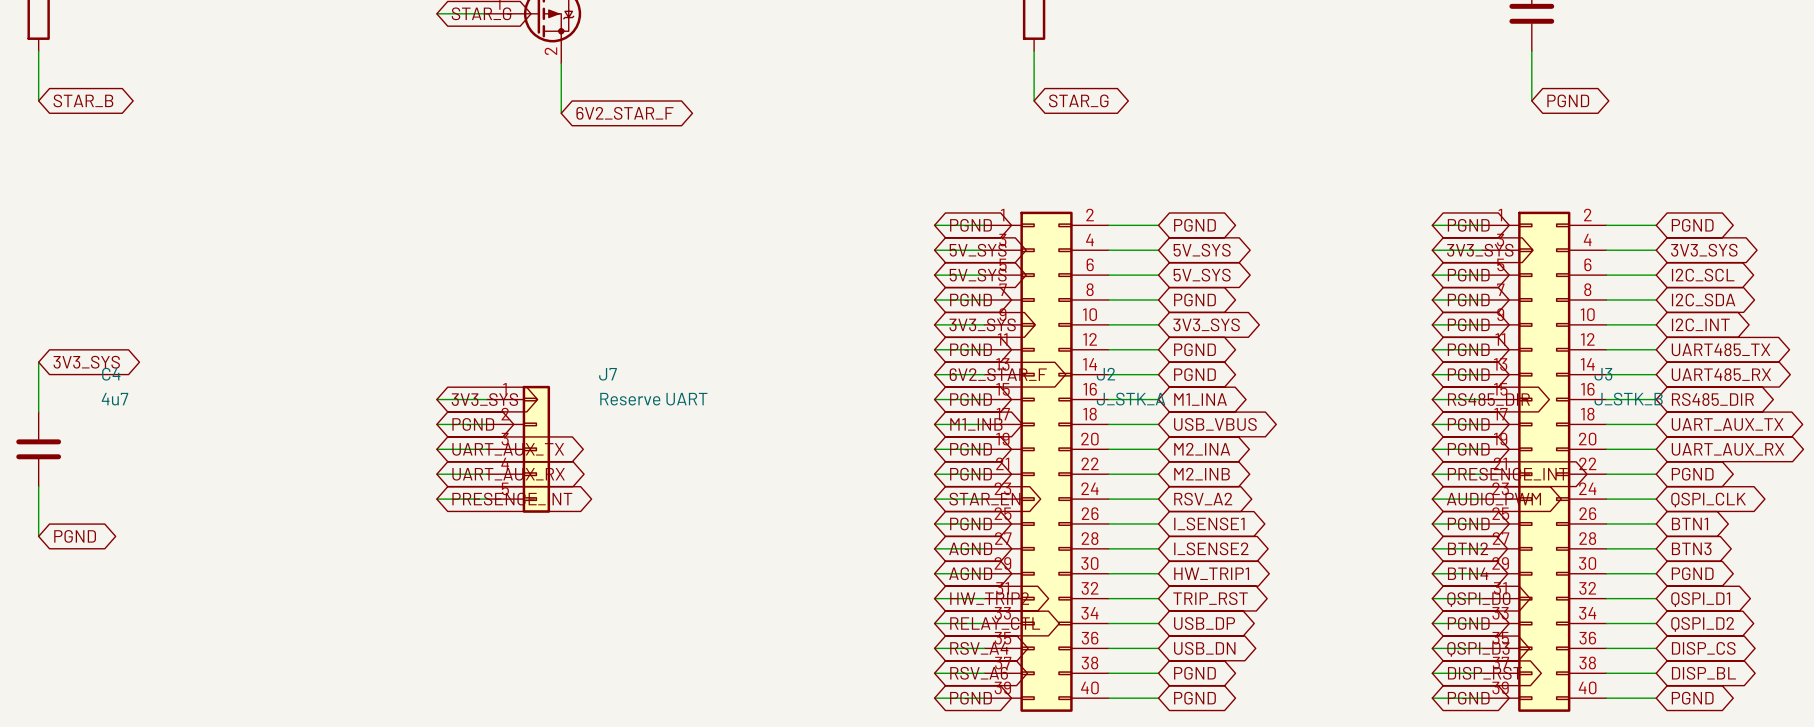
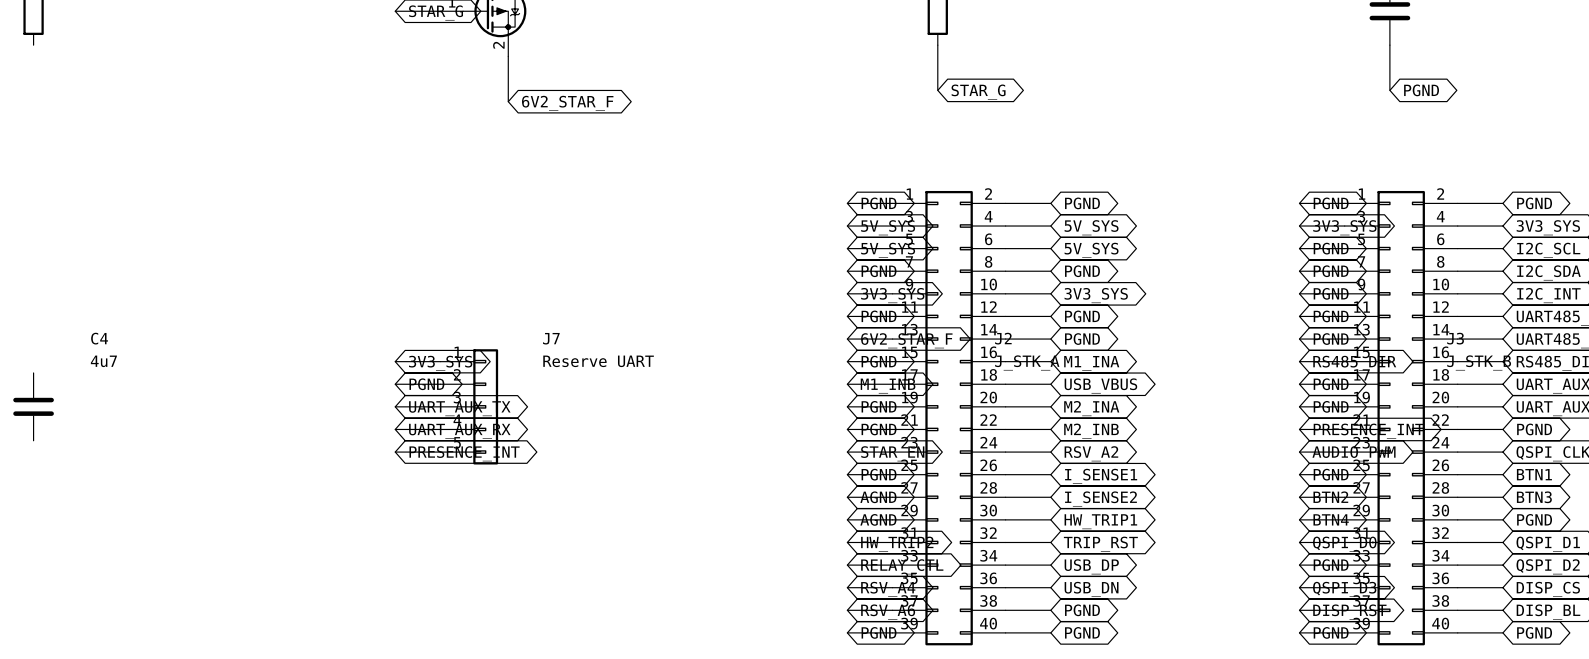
wire: (38, 51) (38, 100) -> none
global label: STAR_B (83, 100) -> none
wire: (38, 362) (38, 411) -> none
global label: 3V3_SYS (86, 362) -> none
wire: (38, 486) (38, 536) -> none
global label: PGND (75, 536) -> none

